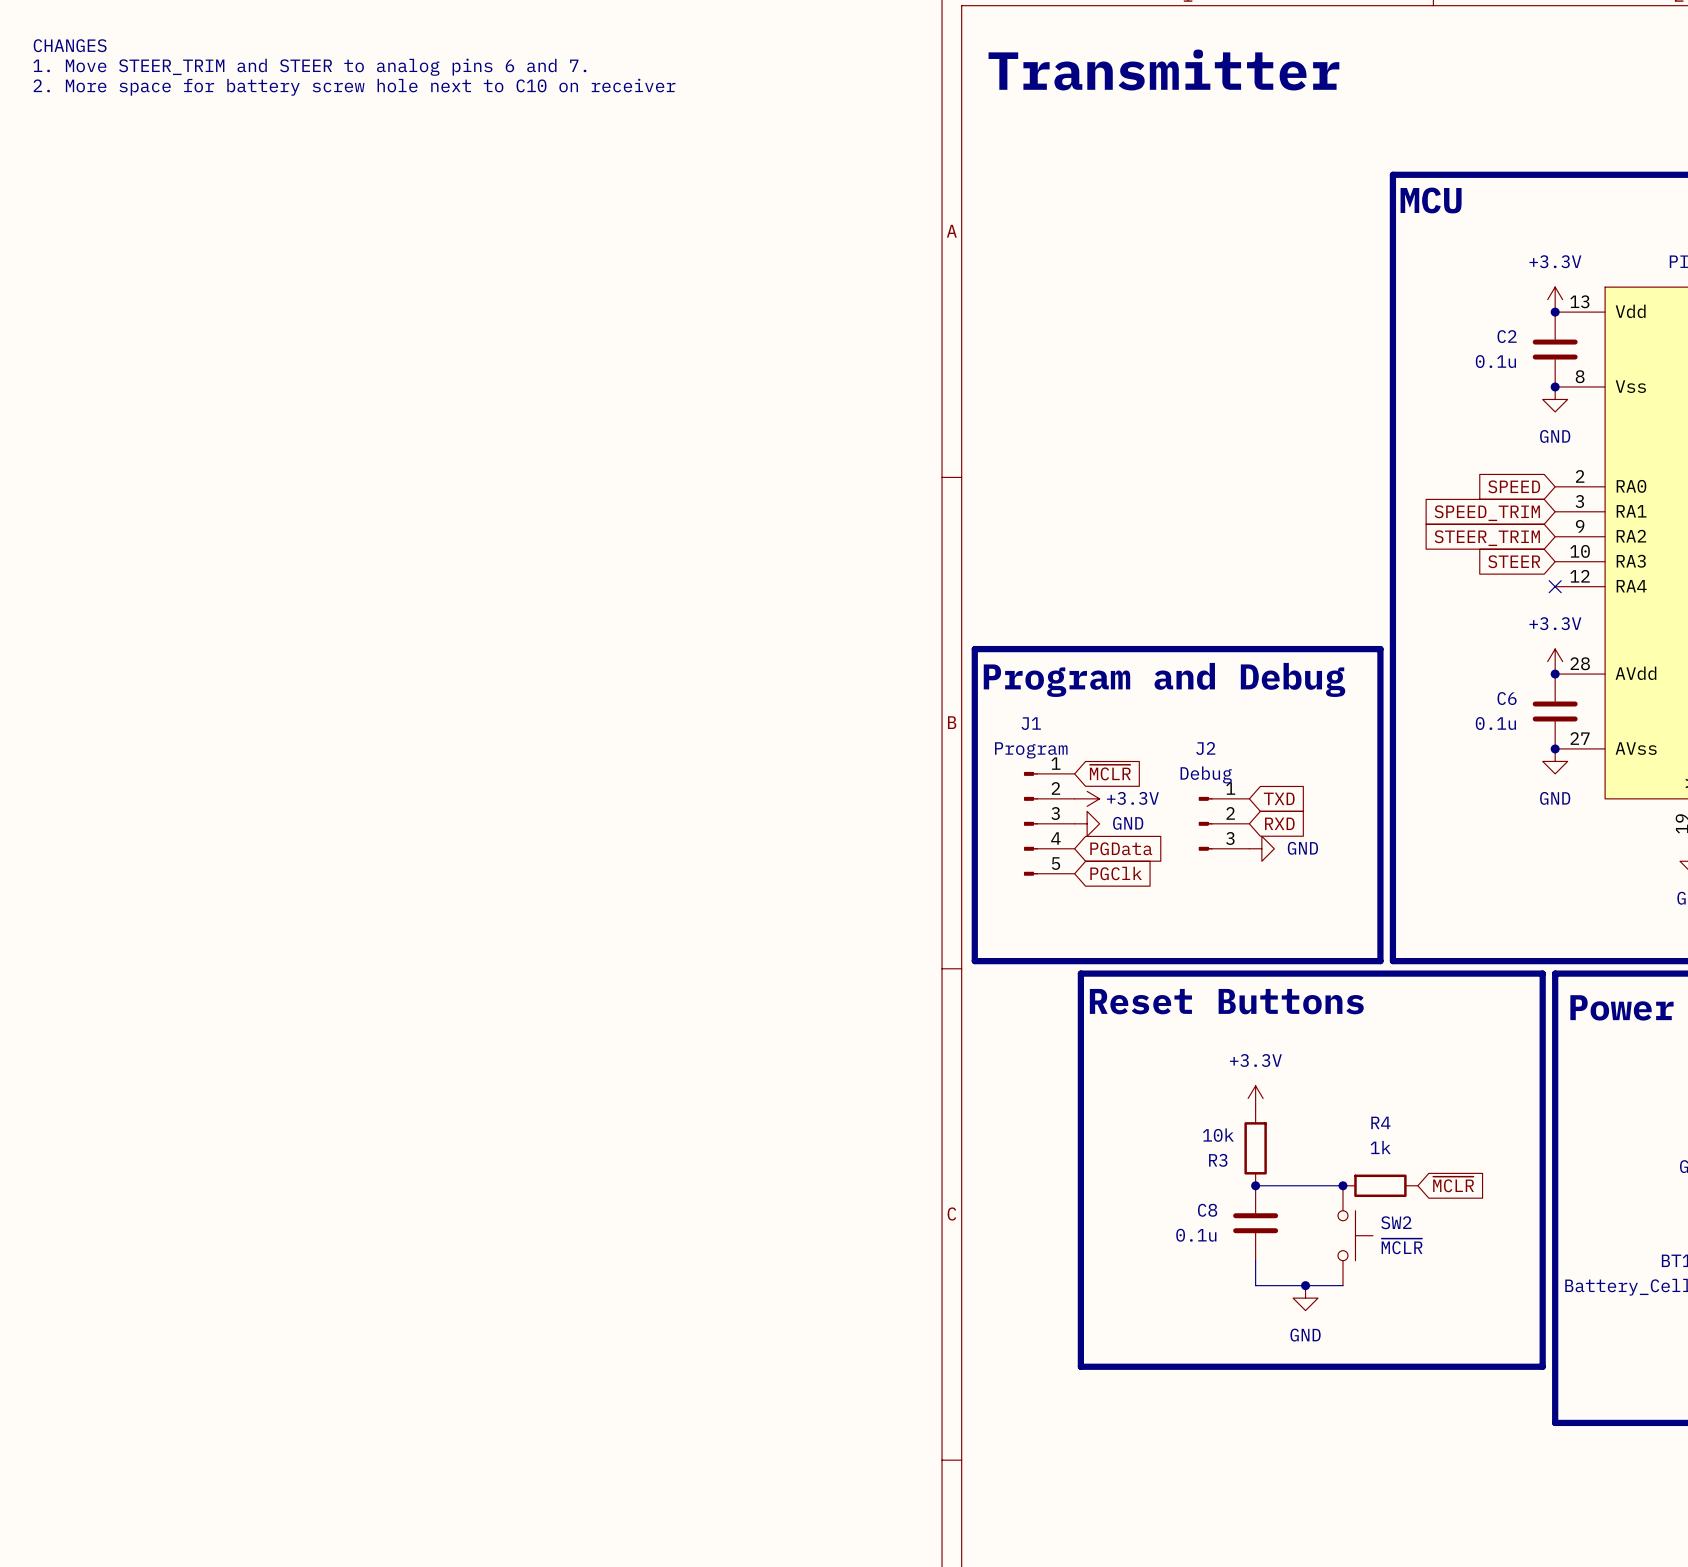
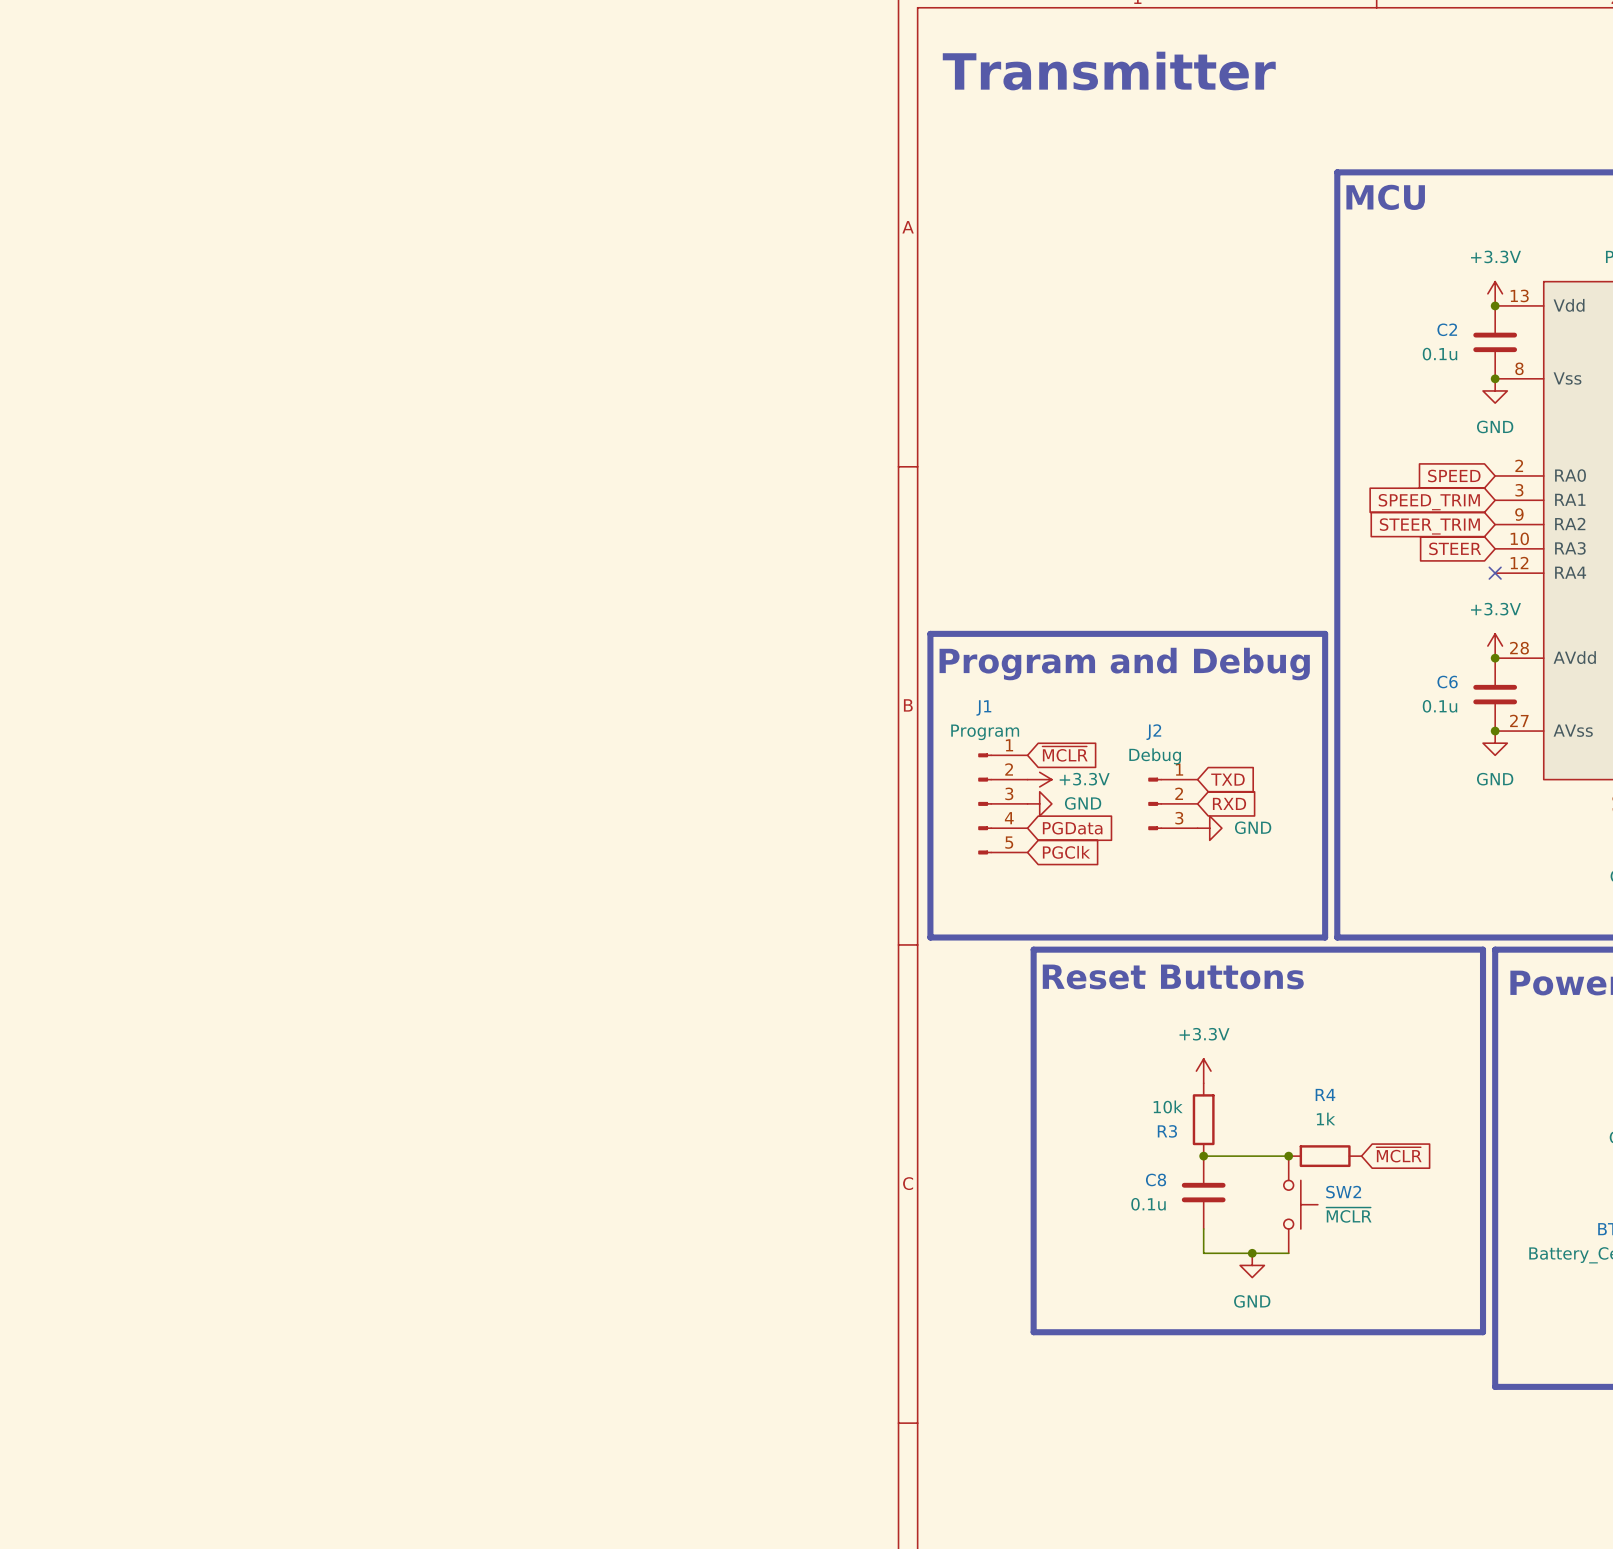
text: CHANGES (70, 45) -> none
text: 1. Move STEER_TRIM and STEER to analog pins 6 and 7. (309, 67) -> none
text: 2. More space for battery screw hole next to C10 on receiver (354, 87) -> none

